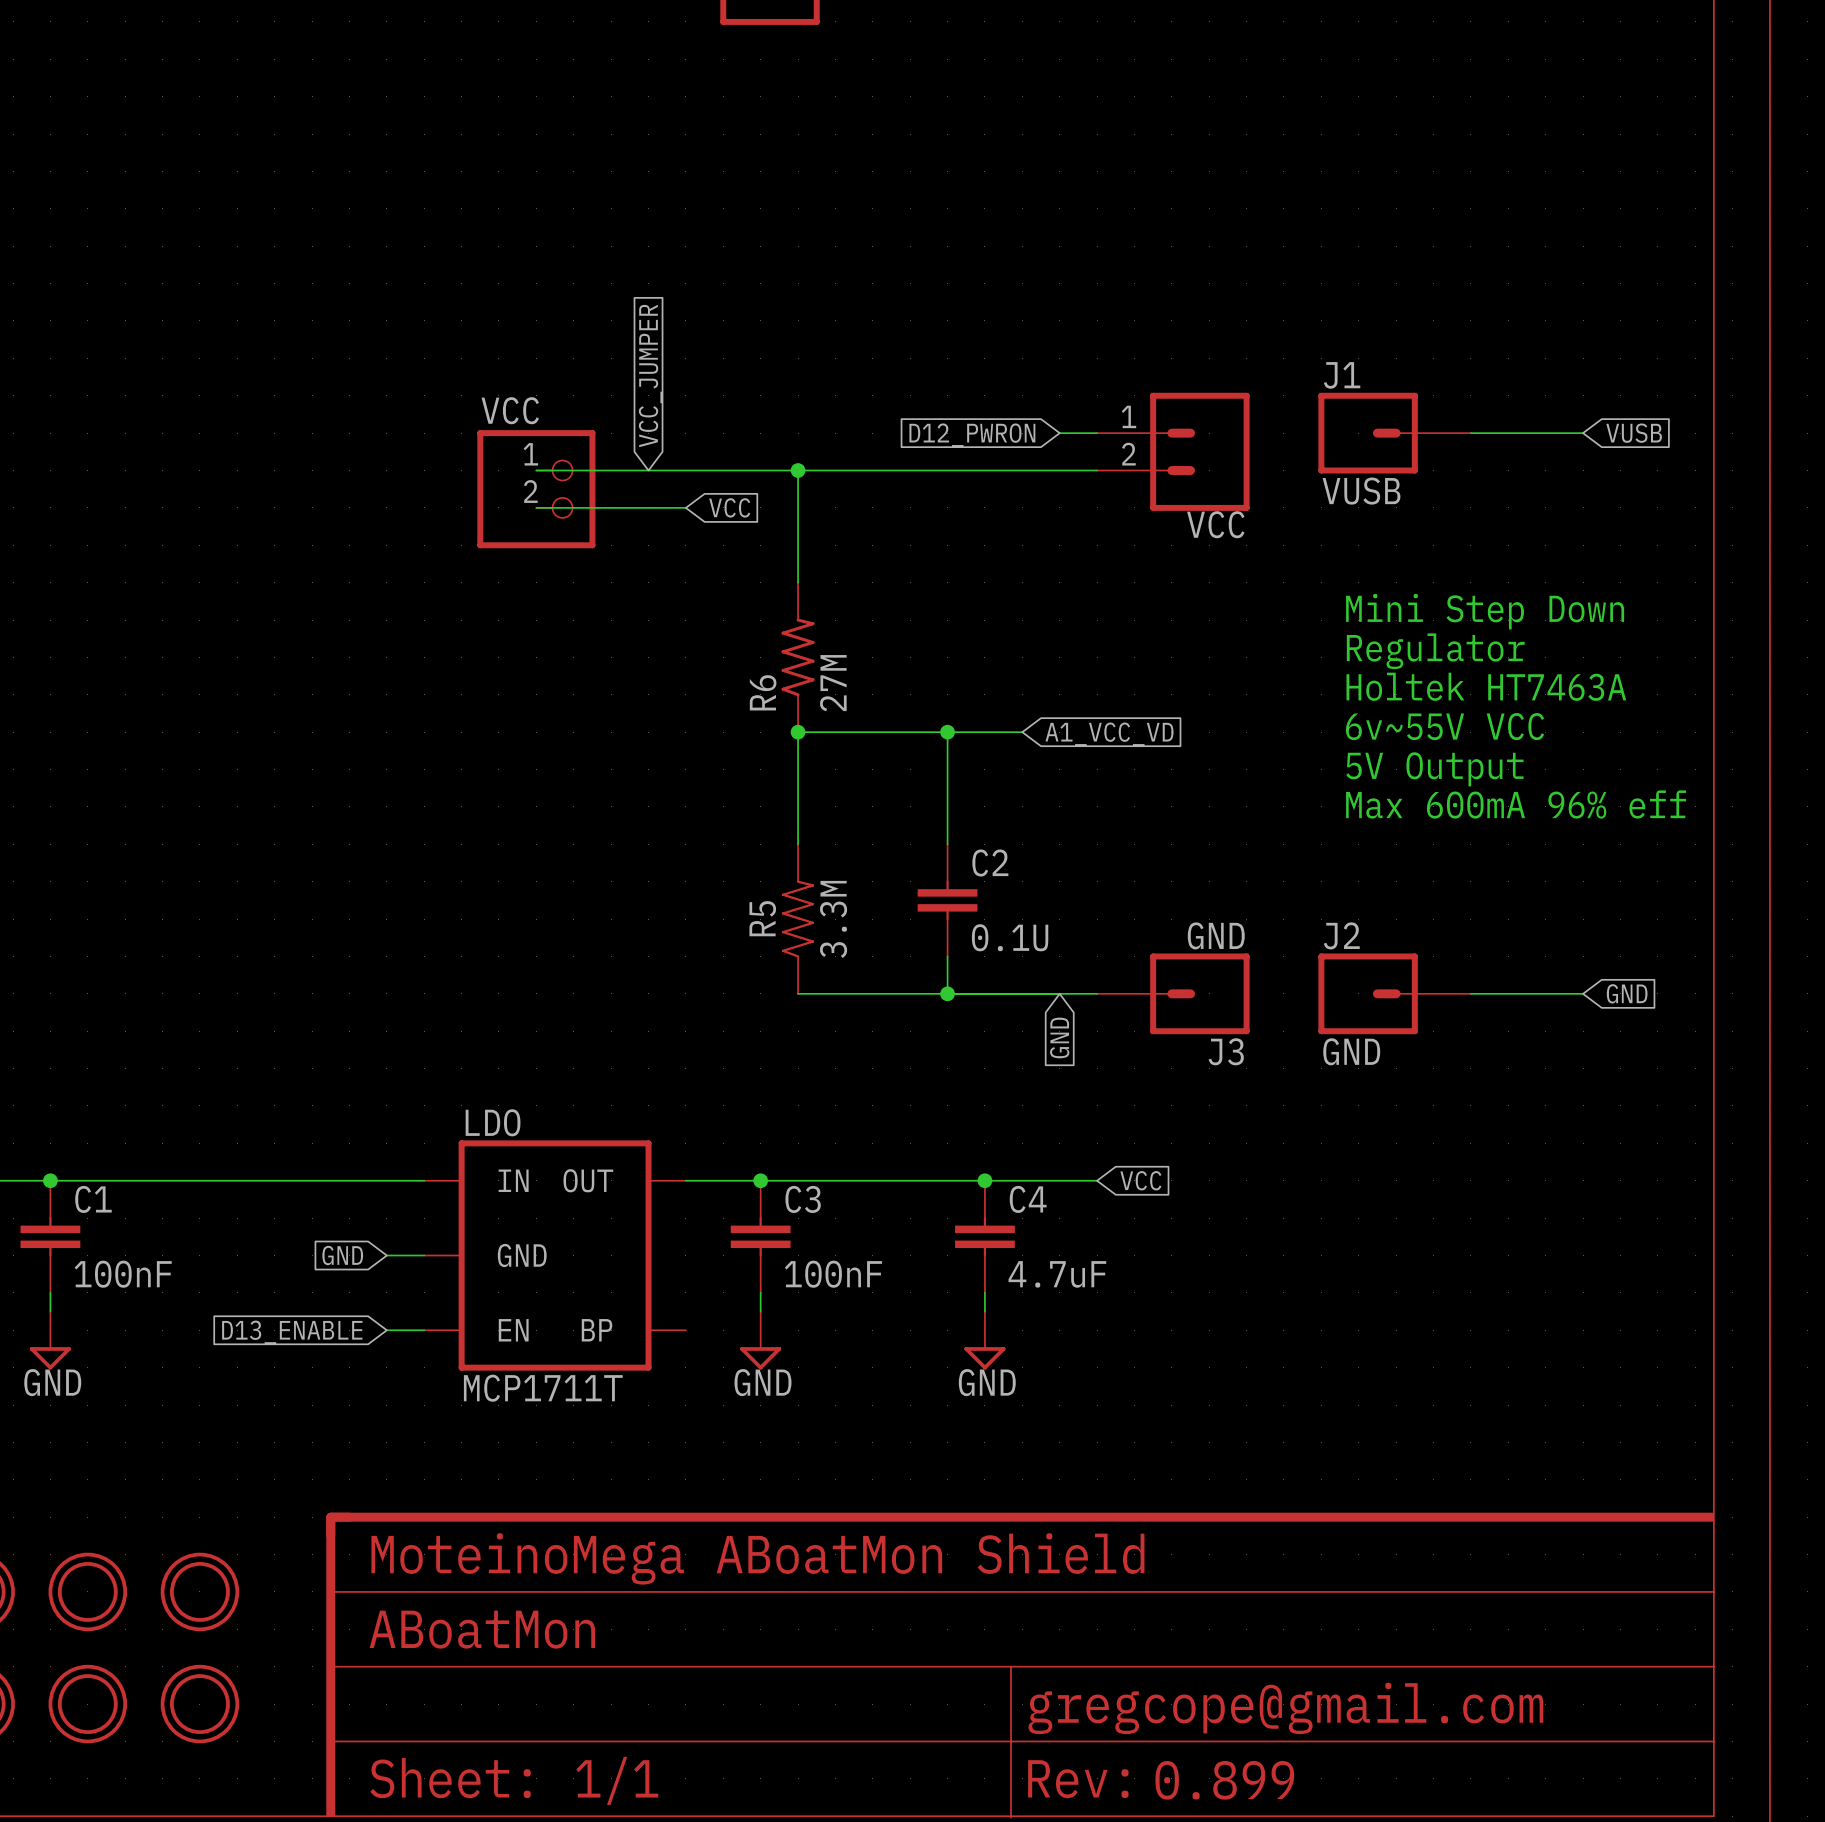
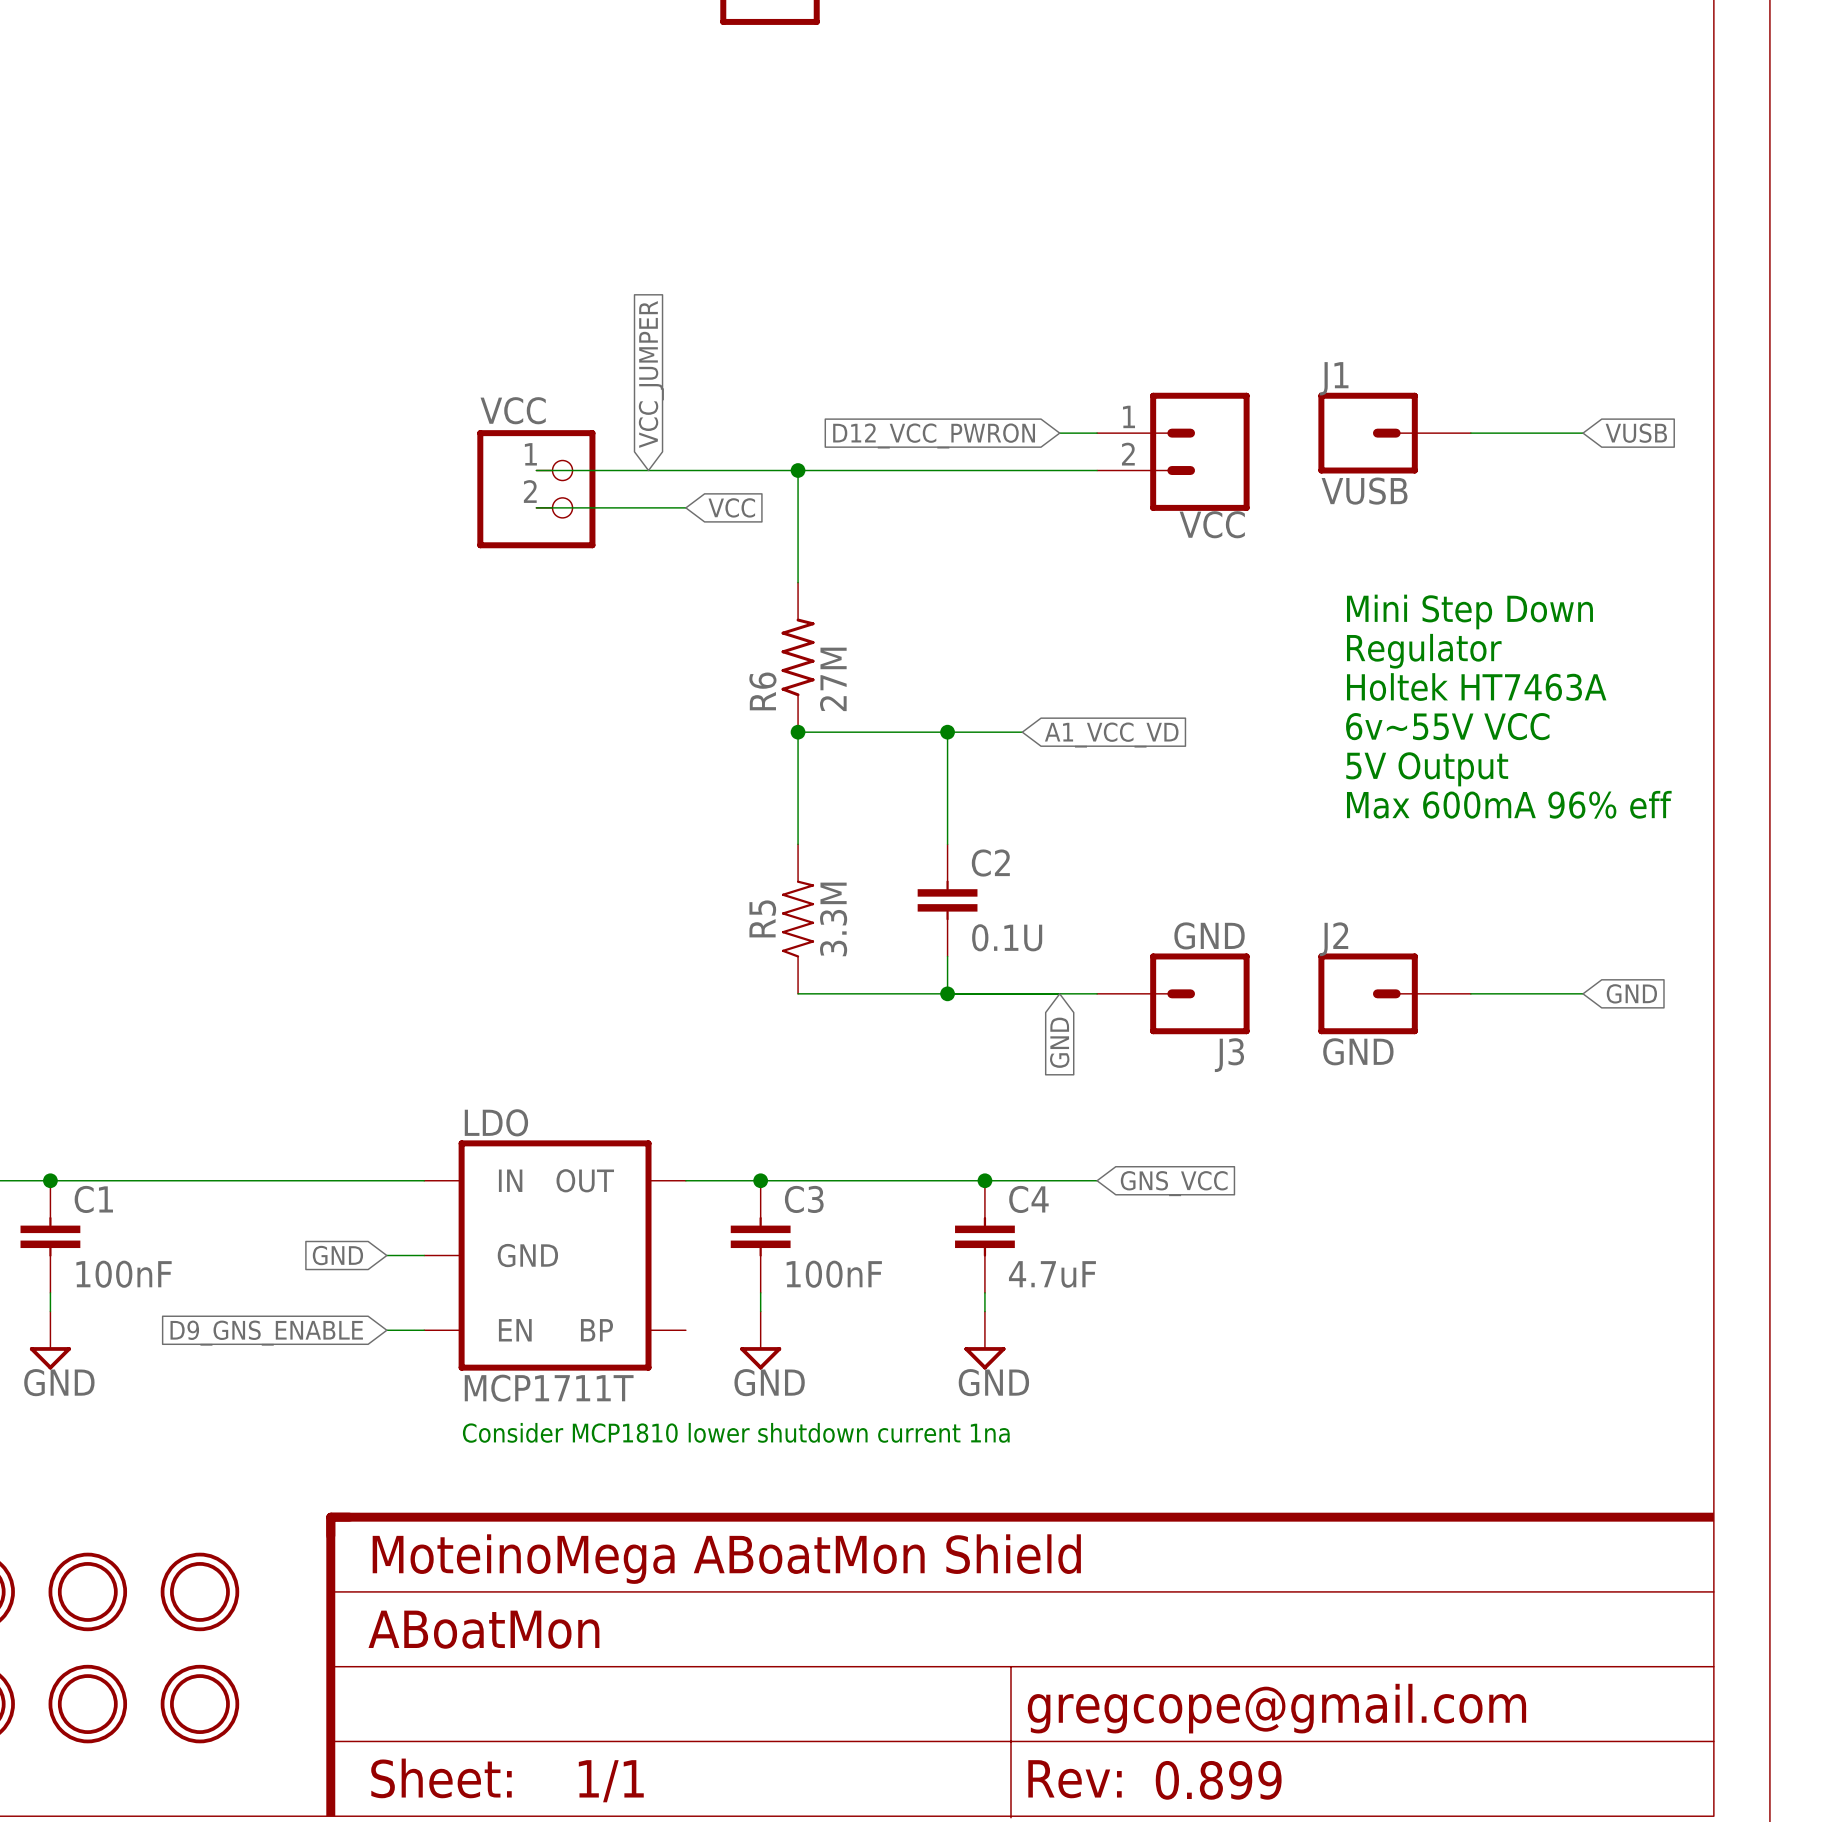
global label: D12_PWRON (972, 435) -> D12_VCC_PWRON (934, 435)
global label: VCC (1140, 1180) -> GNS_VCC (1174, 1183)
global label: D13_ENABLE (292, 1332) -> D9_GNS_ENABLE (266, 1333)
text: none -> Consider MCP1810 lower shutdown current 1na (736, 1432)

